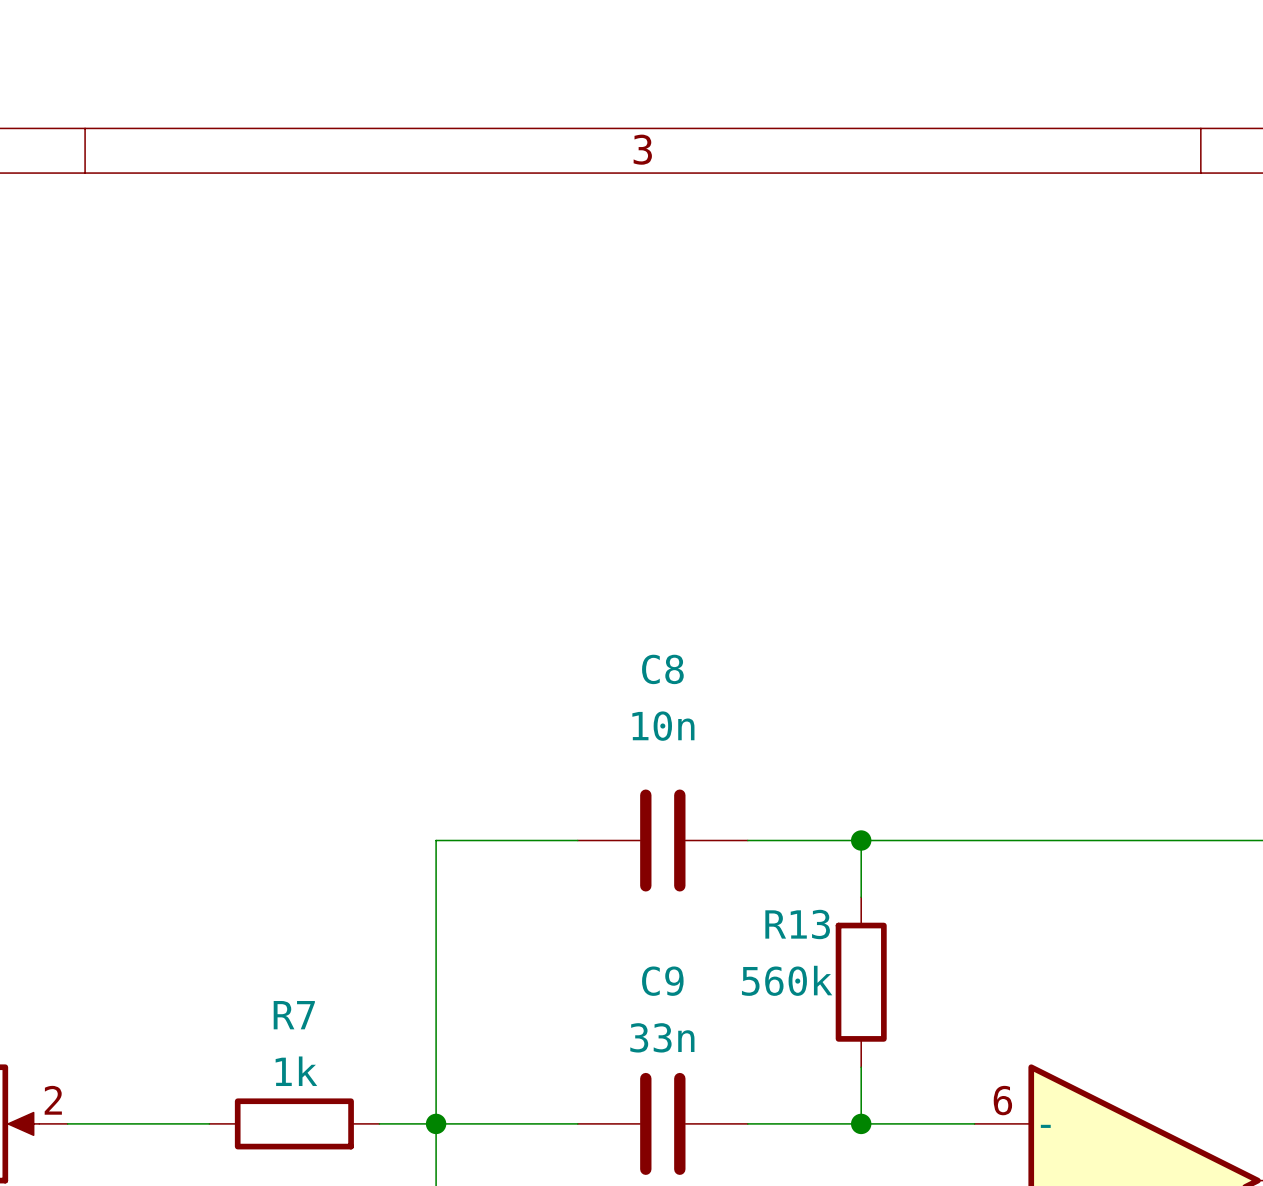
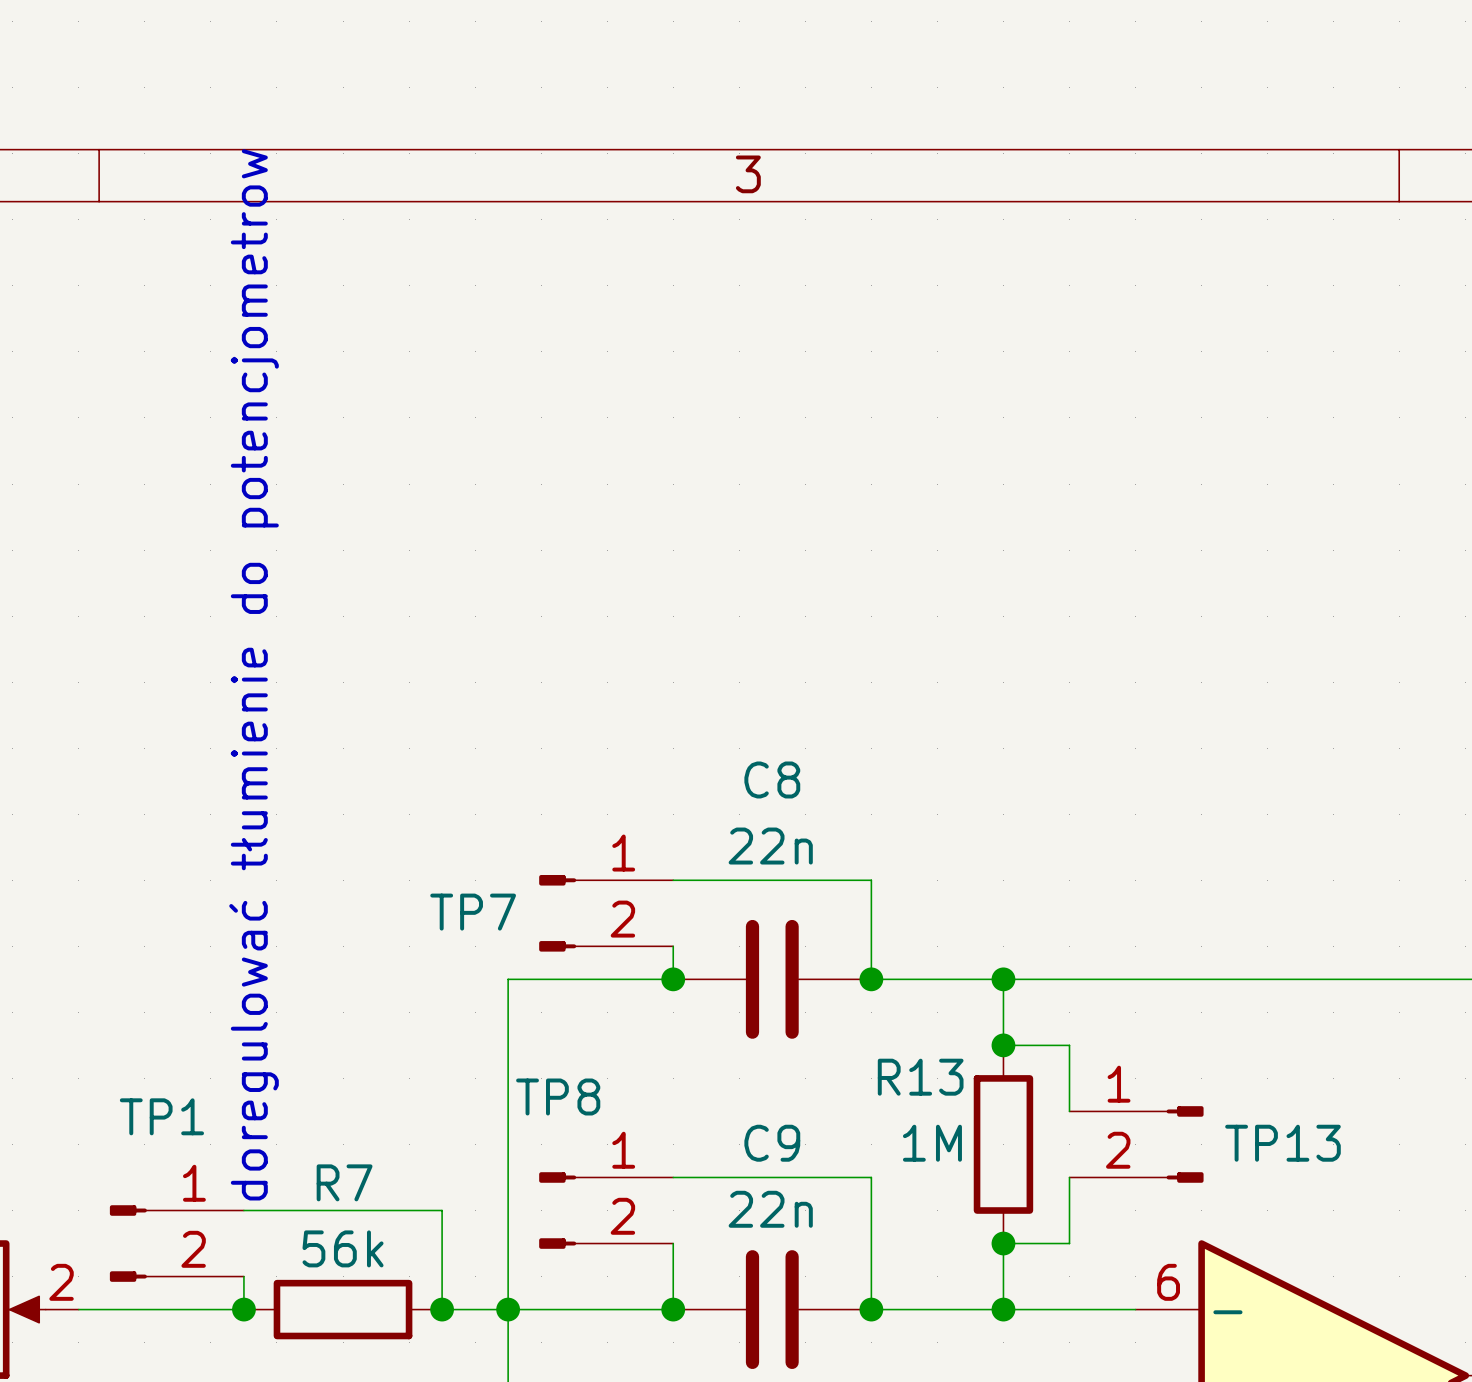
text: none -> doregulować tłumienie do potencjometrow (254, 674)
C8 value: 10n (663, 726) -> 22n (770, 846)
wire: none -> (673, 880) (871, 880) (871, 979)
TP7: none -> (606, 913)
wire: none -> (673, 946) (673, 979)
junction: none -> (673, 979)
junction: none -> (871, 979)
wire: none -> (1003, 1045) (1069, 1045) (1069, 1111)
junction: none -> (1003, 1045)
R13 value: 560k (787, 980) -> 1M (932, 1143)
TP13: none -> (1136, 1144)
wire: none -> (673, 1177) (871, 1177) (871, 1309)
wire: none -> (1069, 1177) (1069, 1243) (1003, 1243)
C9 value: 33n (662, 1037) -> 22n (770, 1209)
wire: none -> (243, 1210) (442, 1210) (442, 1309)
TP8: none -> (606, 1210)
TP1: none -> (176, 1243)
wire: none -> (673, 1243) (673, 1309)
junction: none -> (1003, 1243)
R7 value: 1k (296, 1071) -> 56k (343, 1248)
wire: none -> (243, 1276) (243, 1309)
junction: none -> (243, 1309)
junction: none -> (442, 1309)
junction: none -> (673, 1309)
junction: none -> (871, 1309)

